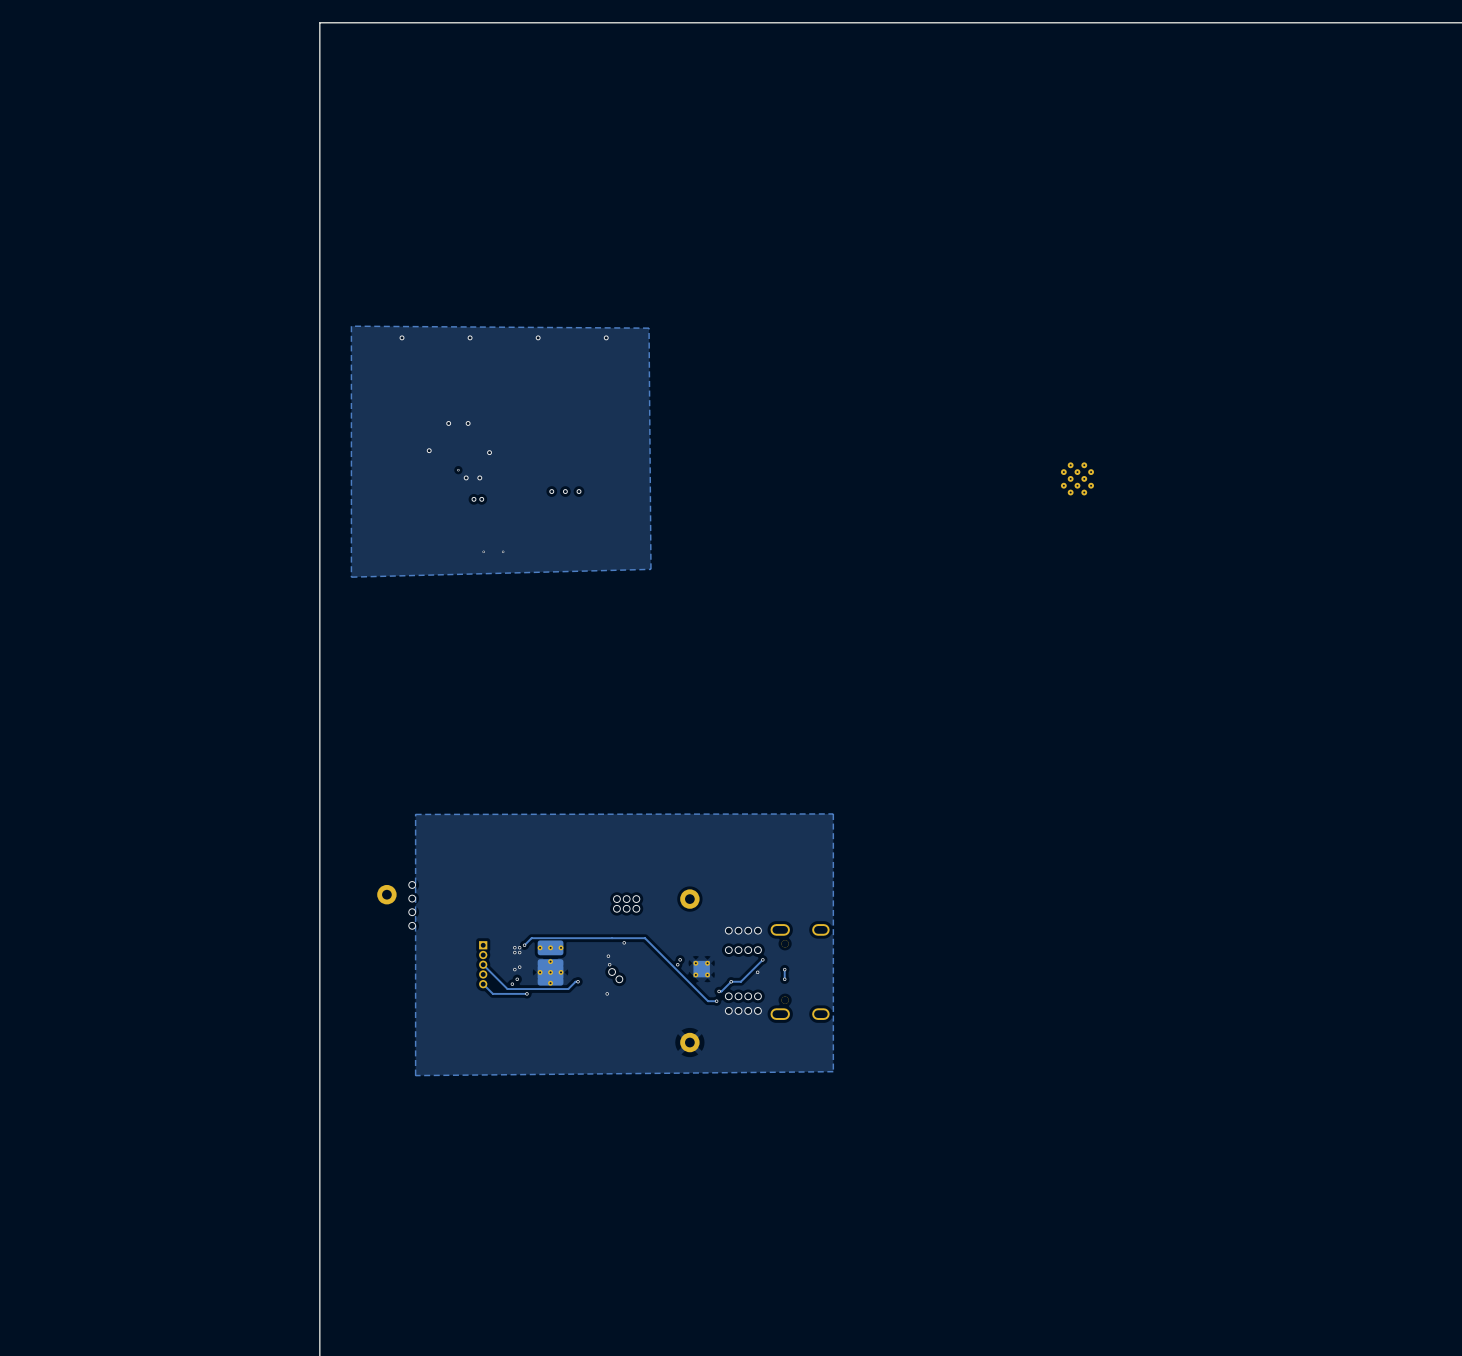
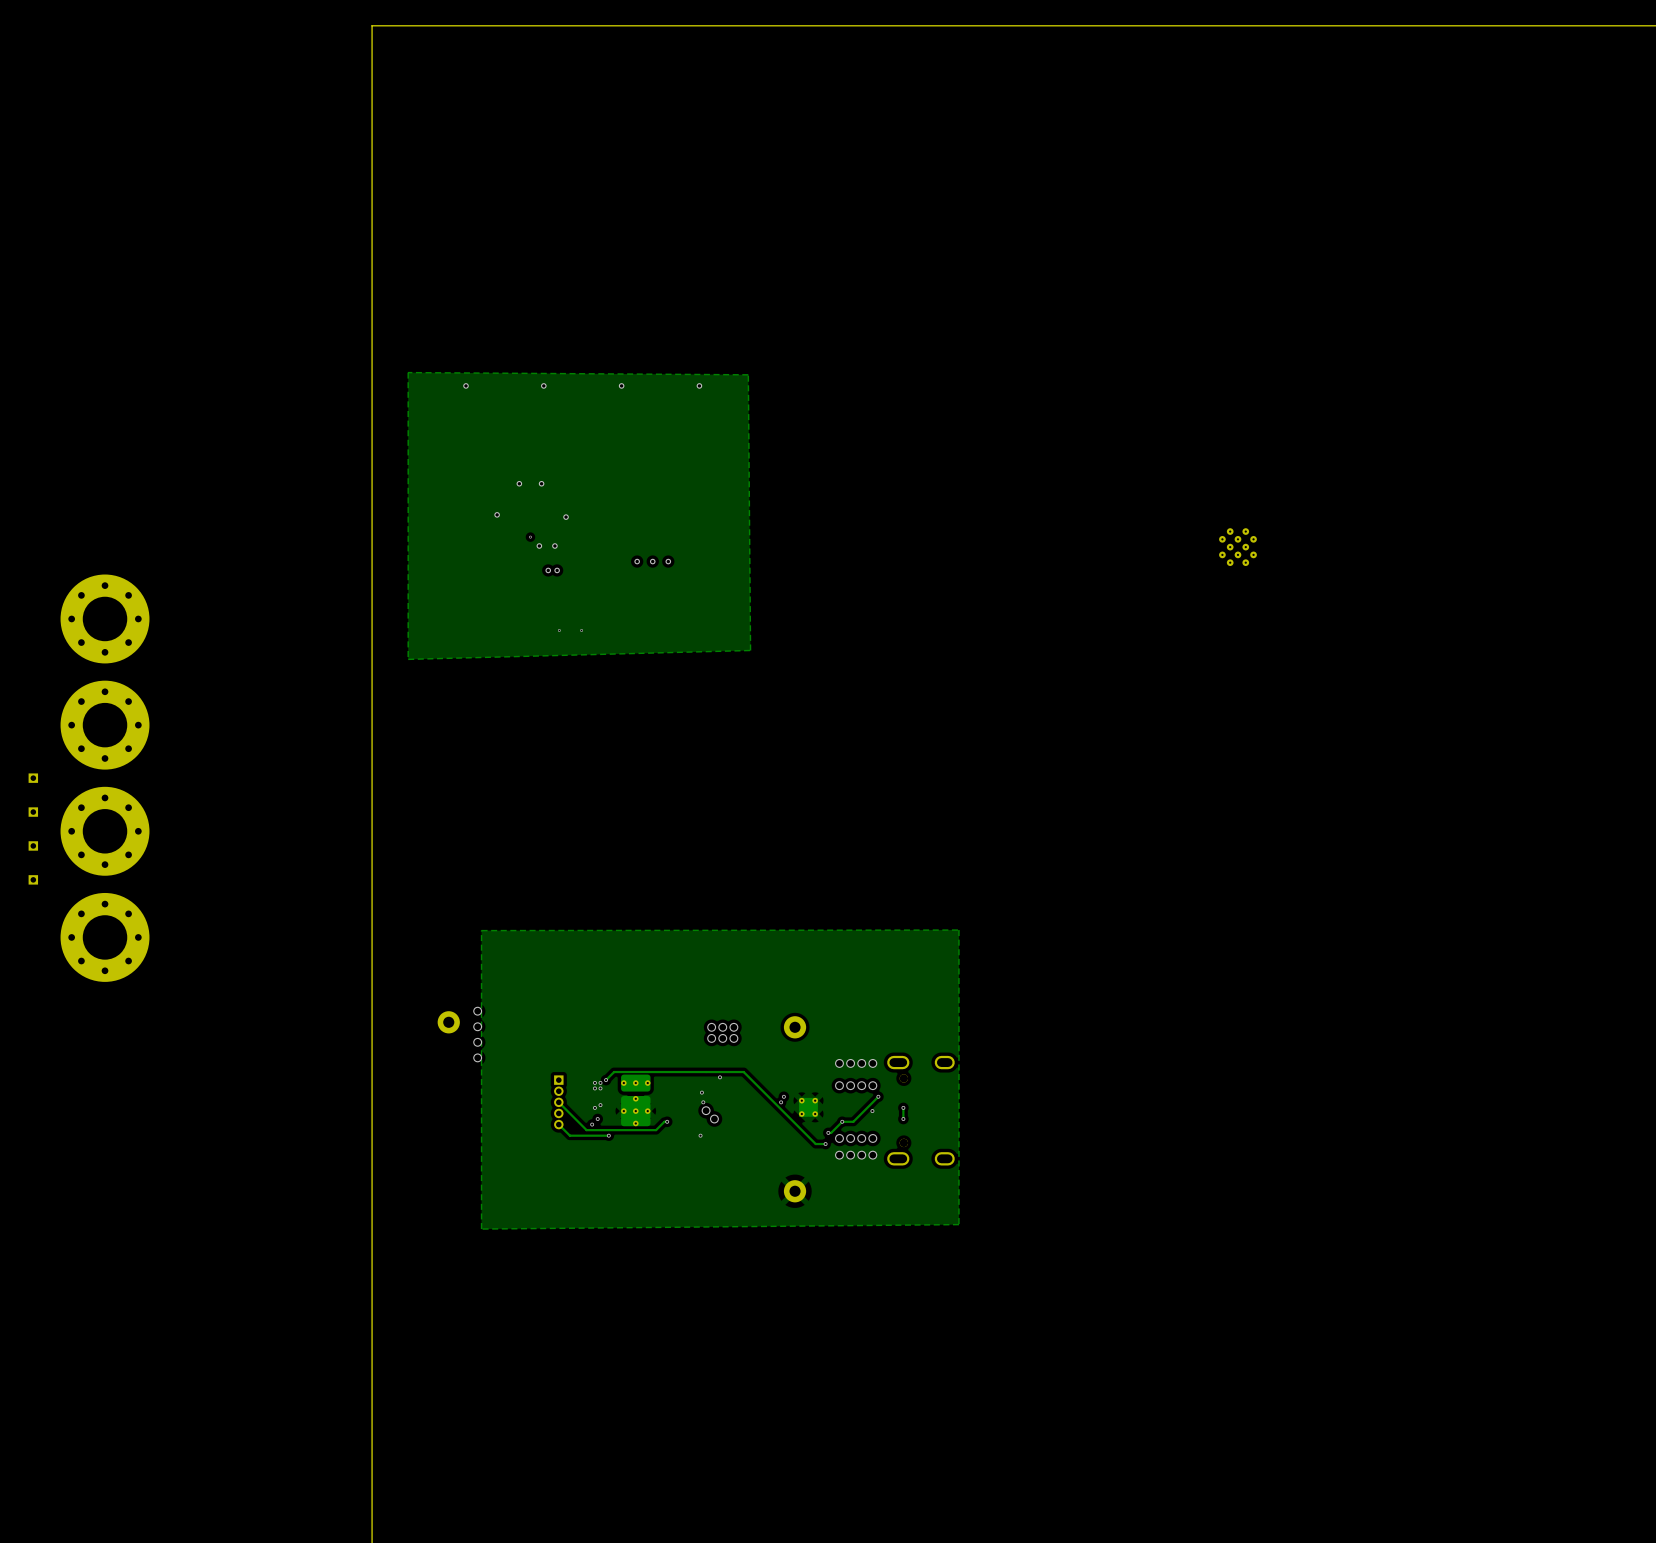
part: none -> (105, 618)
part: none -> (105, 725)
part: none -> (33, 778)
part: none -> (33, 812)
part: none -> (105, 831)
part: none -> (33, 845)
part: none -> (33, 879)
part: none -> (105, 937)

